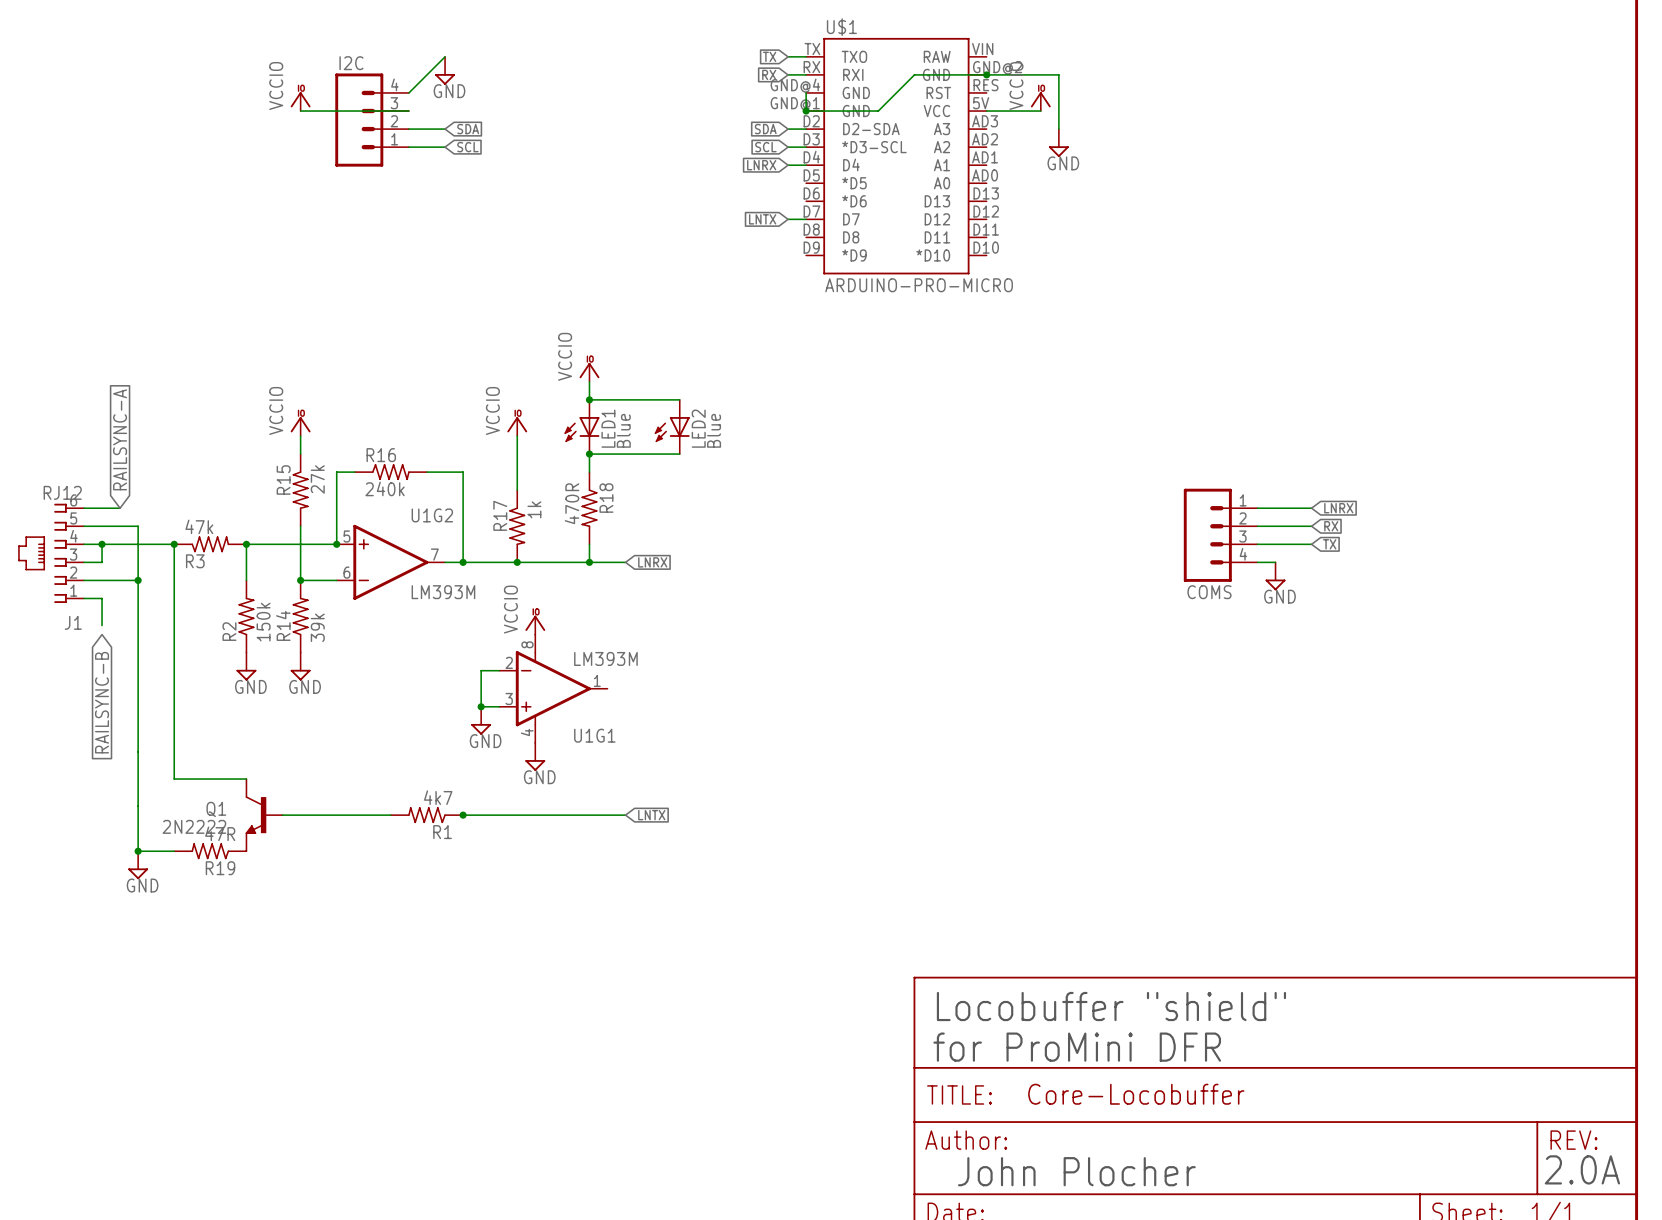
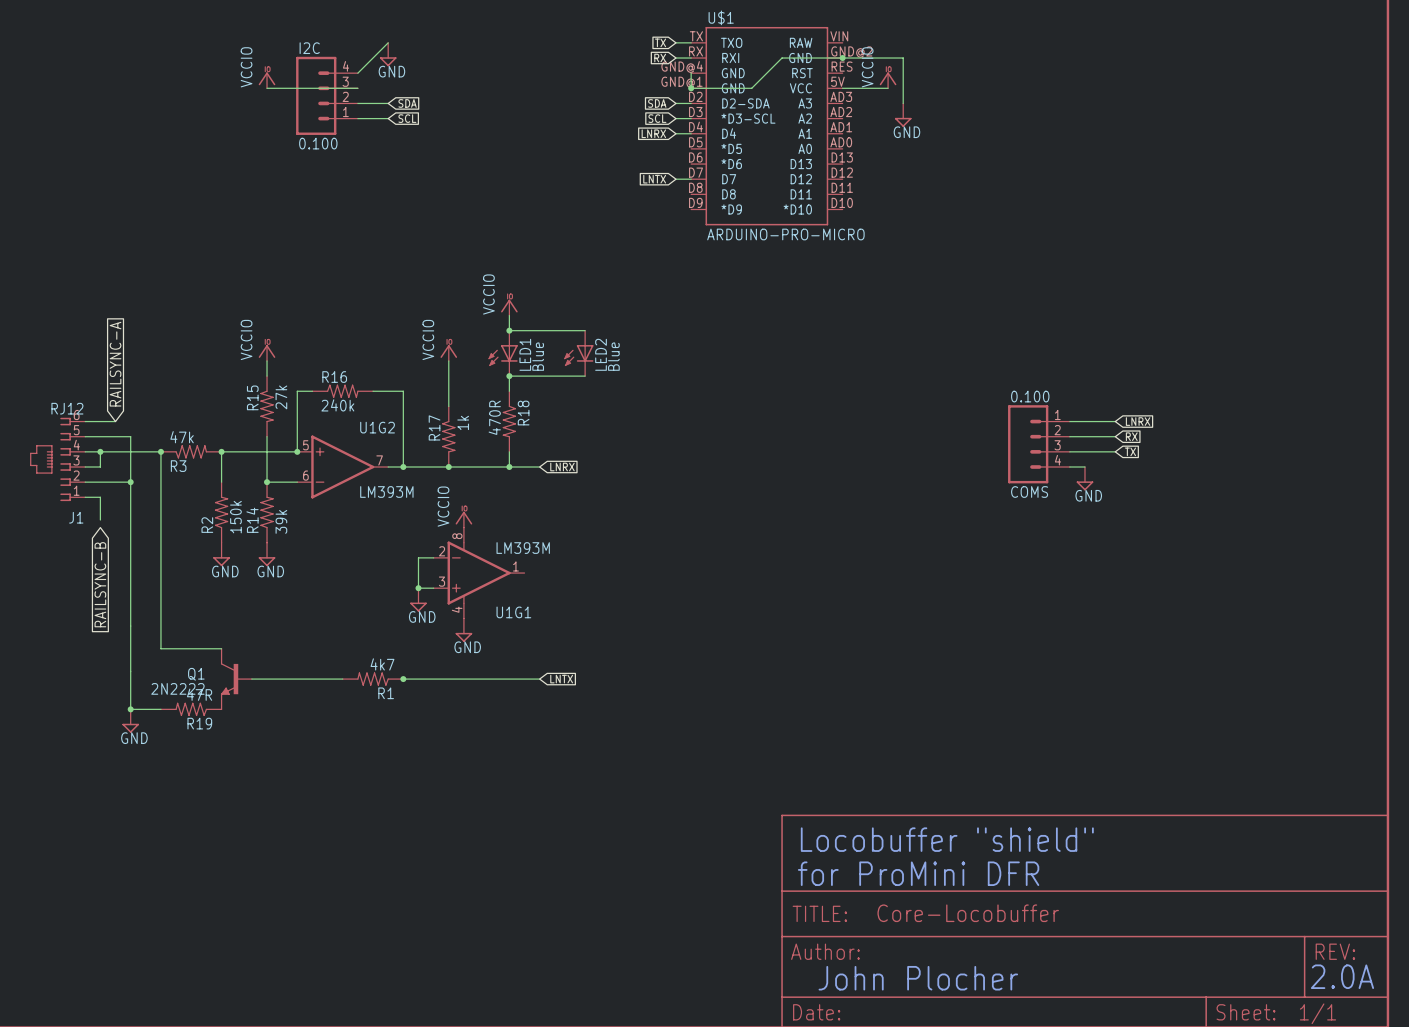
I2C value: none -> 0.100 (318, 143)
COMS value: none -> 0.100 (1030, 396)

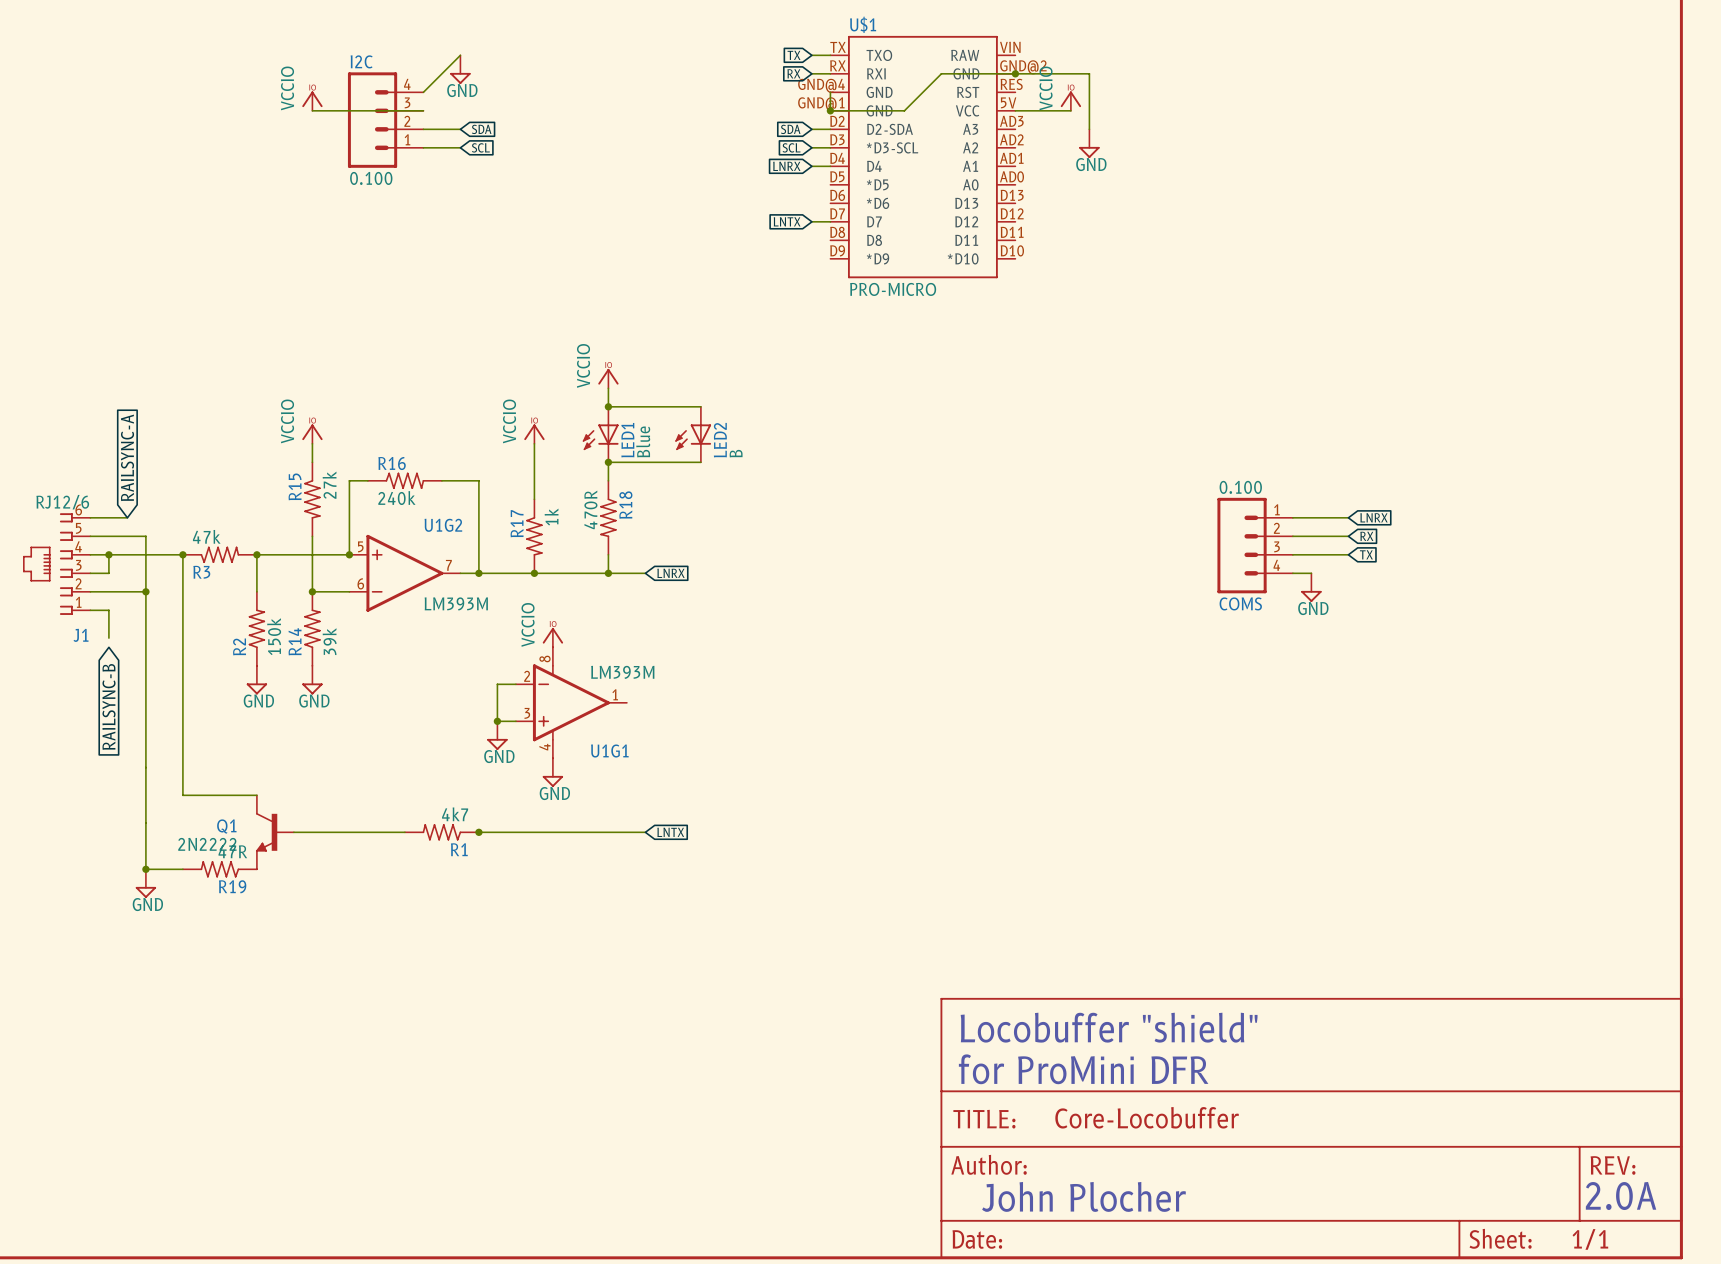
U$1 value: ARDUINO-PRO-MICRO (785, 234) -> PRO-MICRO (893, 289)
LED2 value: Blue (613, 356) -> B (736, 453)
J1 value: RJ12 (67, 408) -> RJ12/6 (62, 502)

